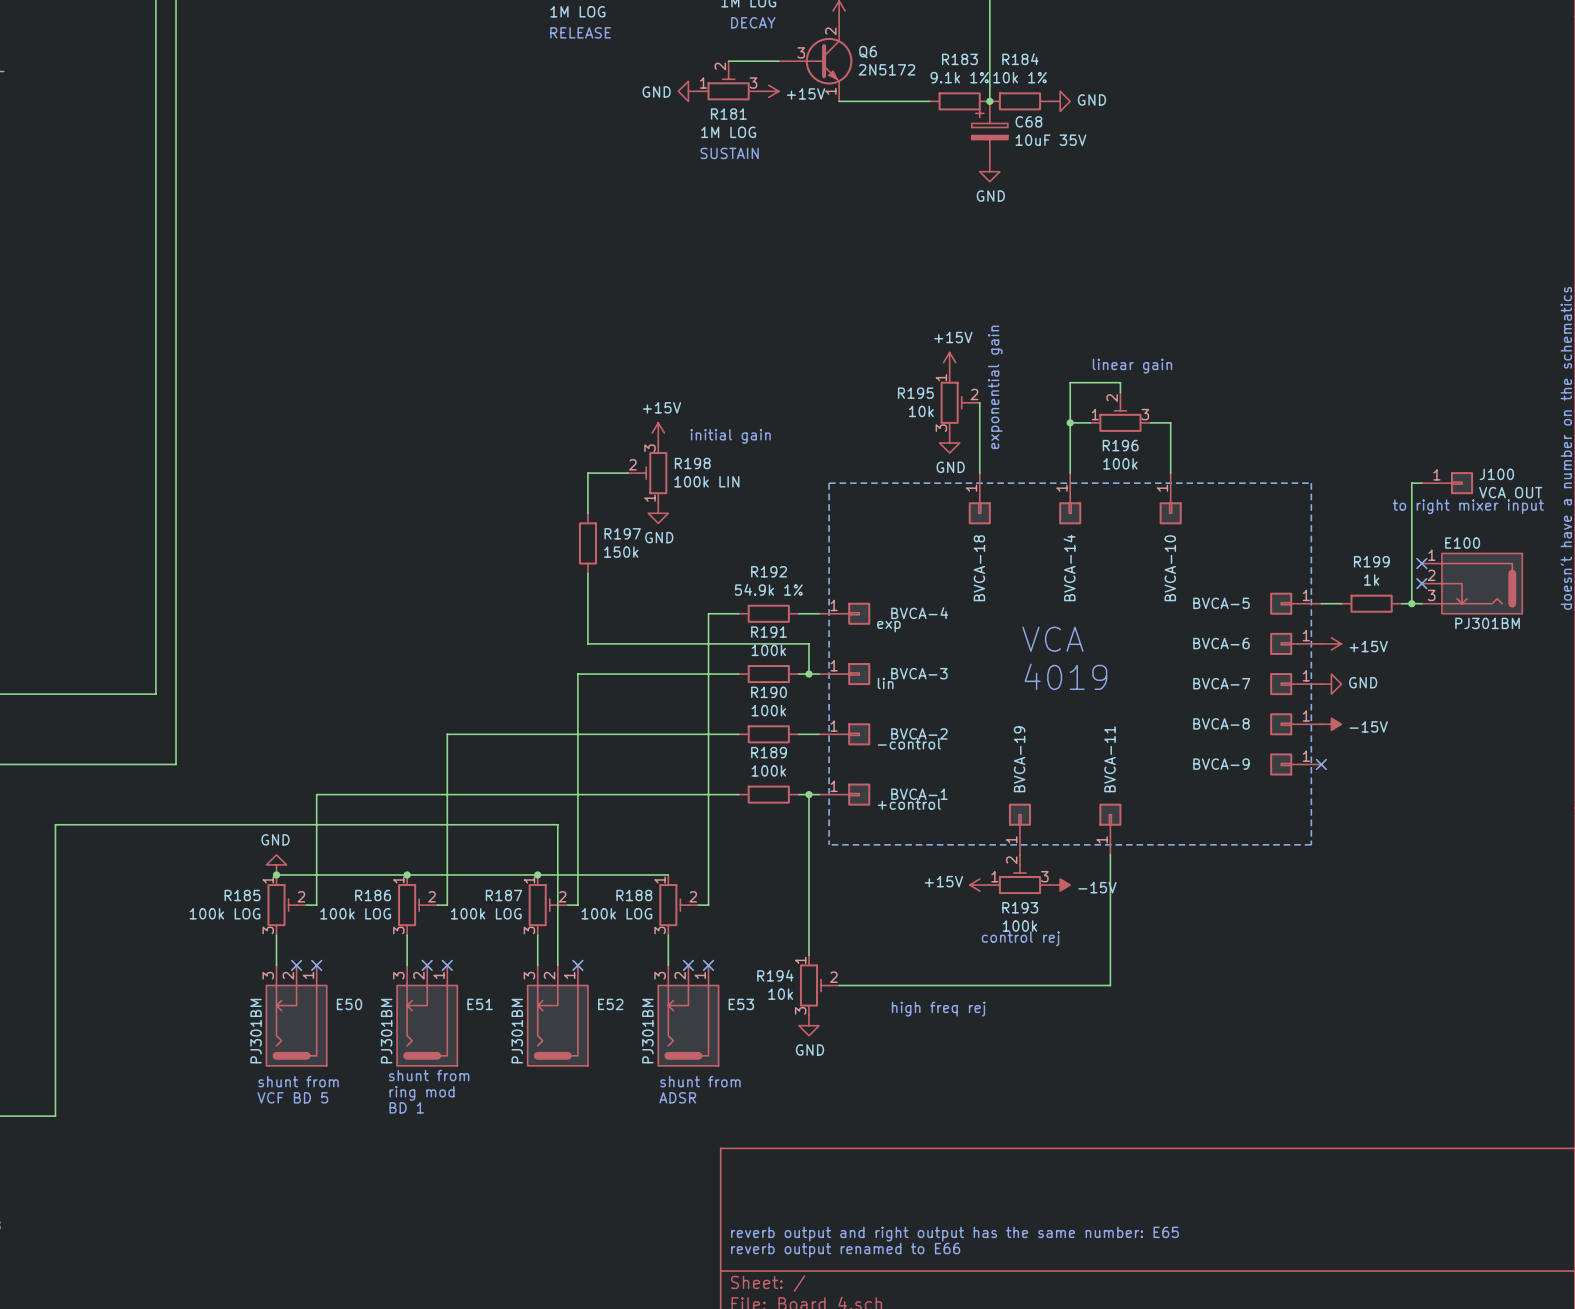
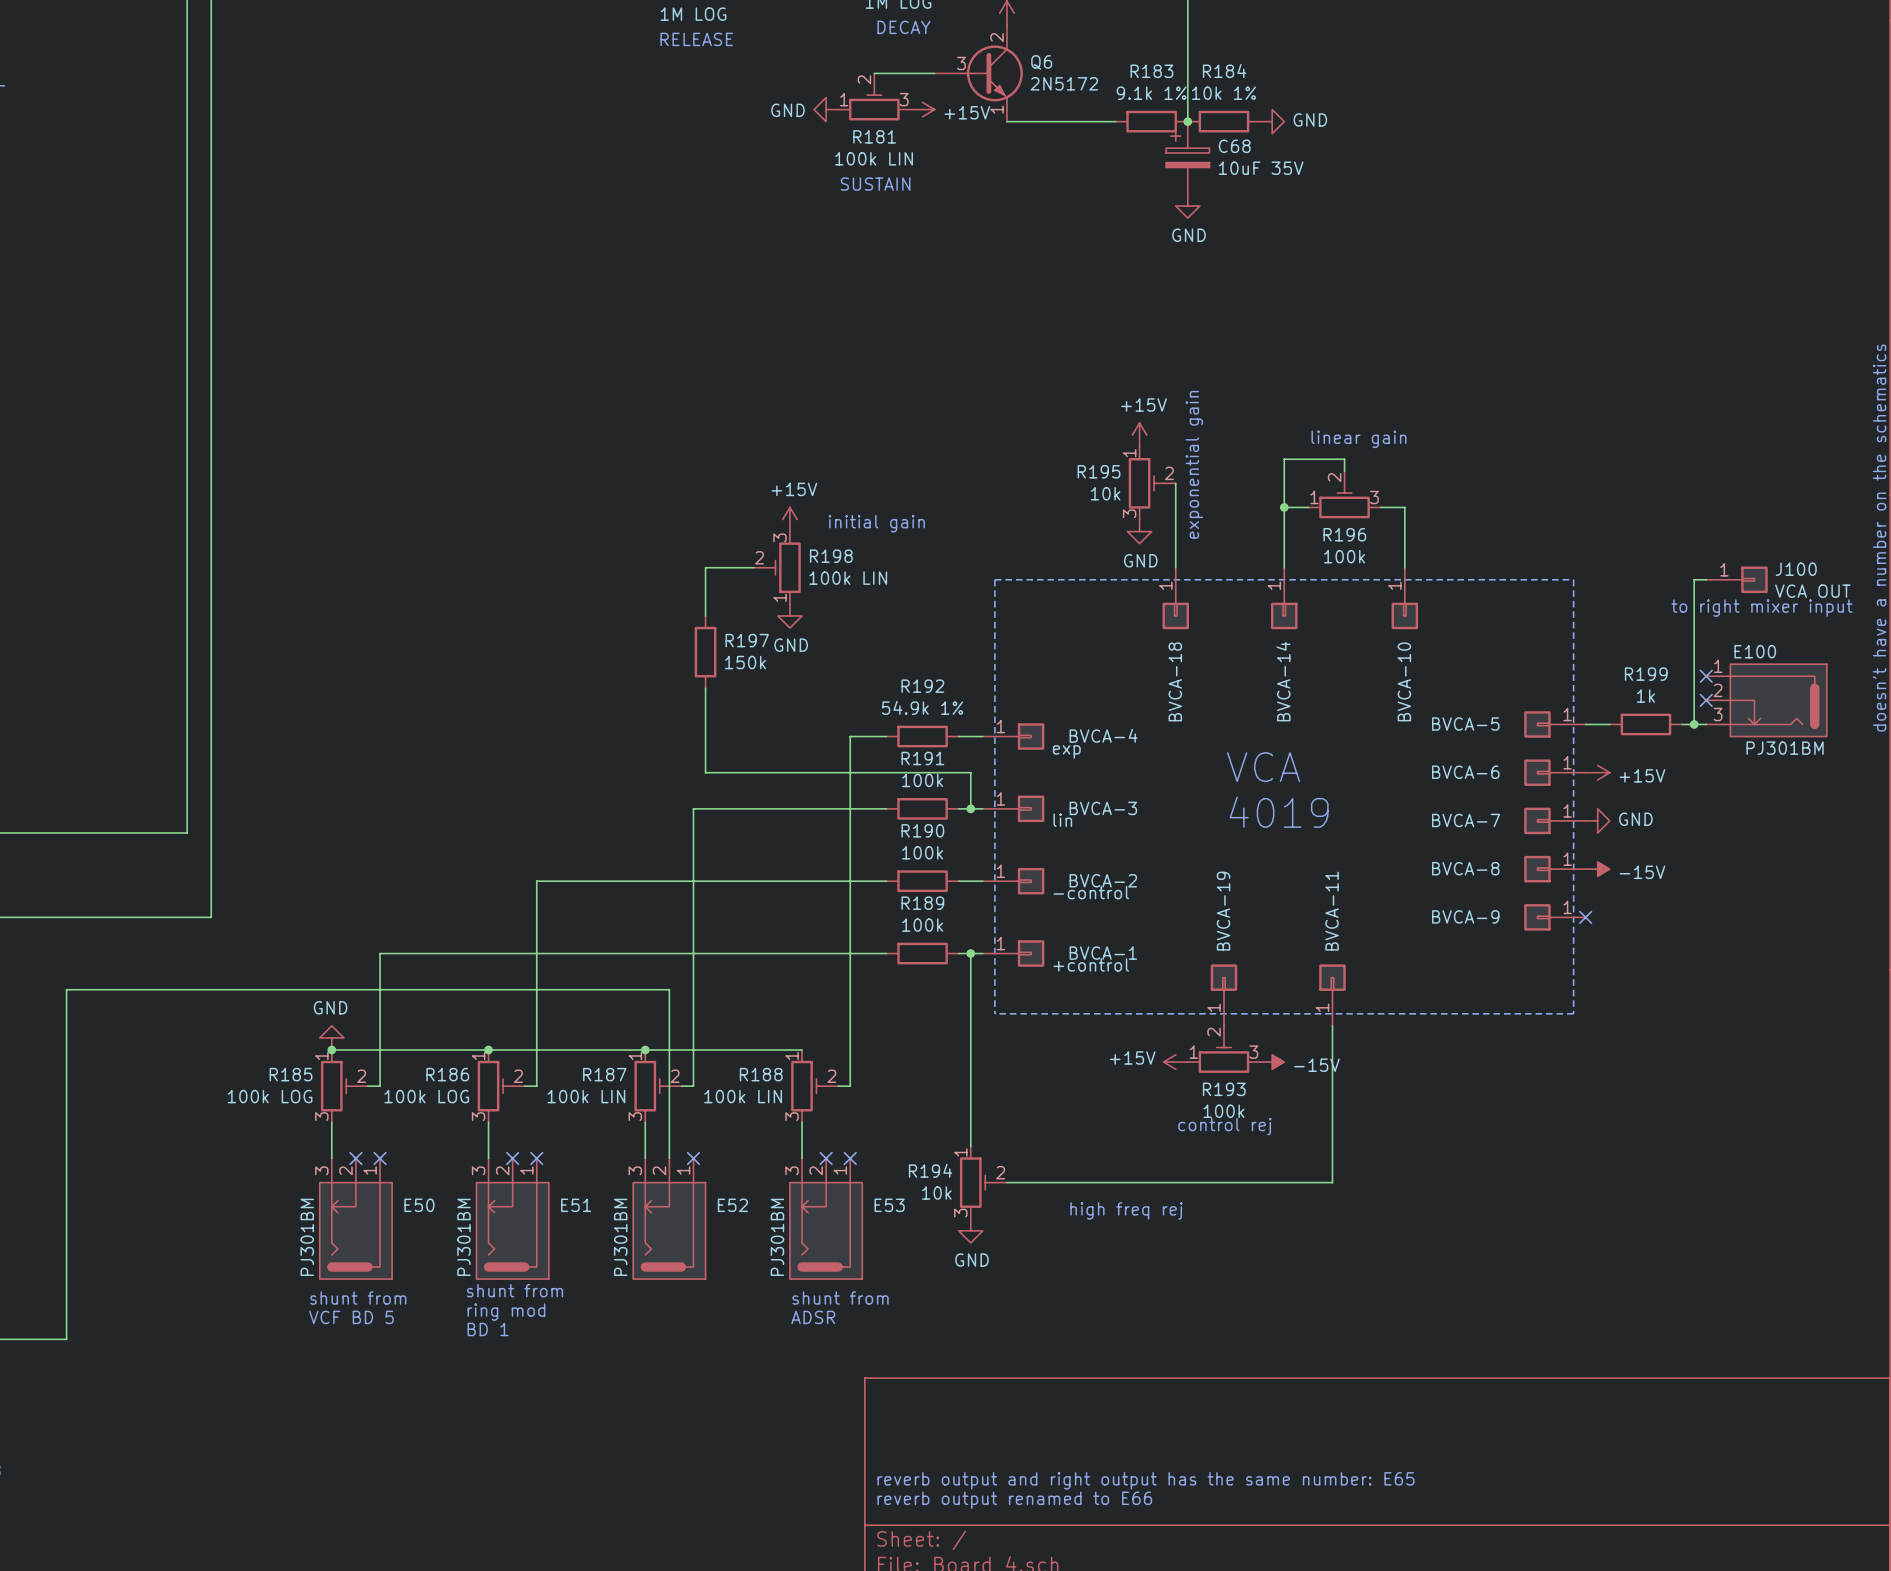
R181 value: 1M LOG (728, 132) -> 100k LIN (874, 158)
R187 value: 100k LOG (486, 913) -> 100k LIN (586, 1096)
R188 value: 100k LOG (616, 913) -> 100k LIN (743, 1096)

